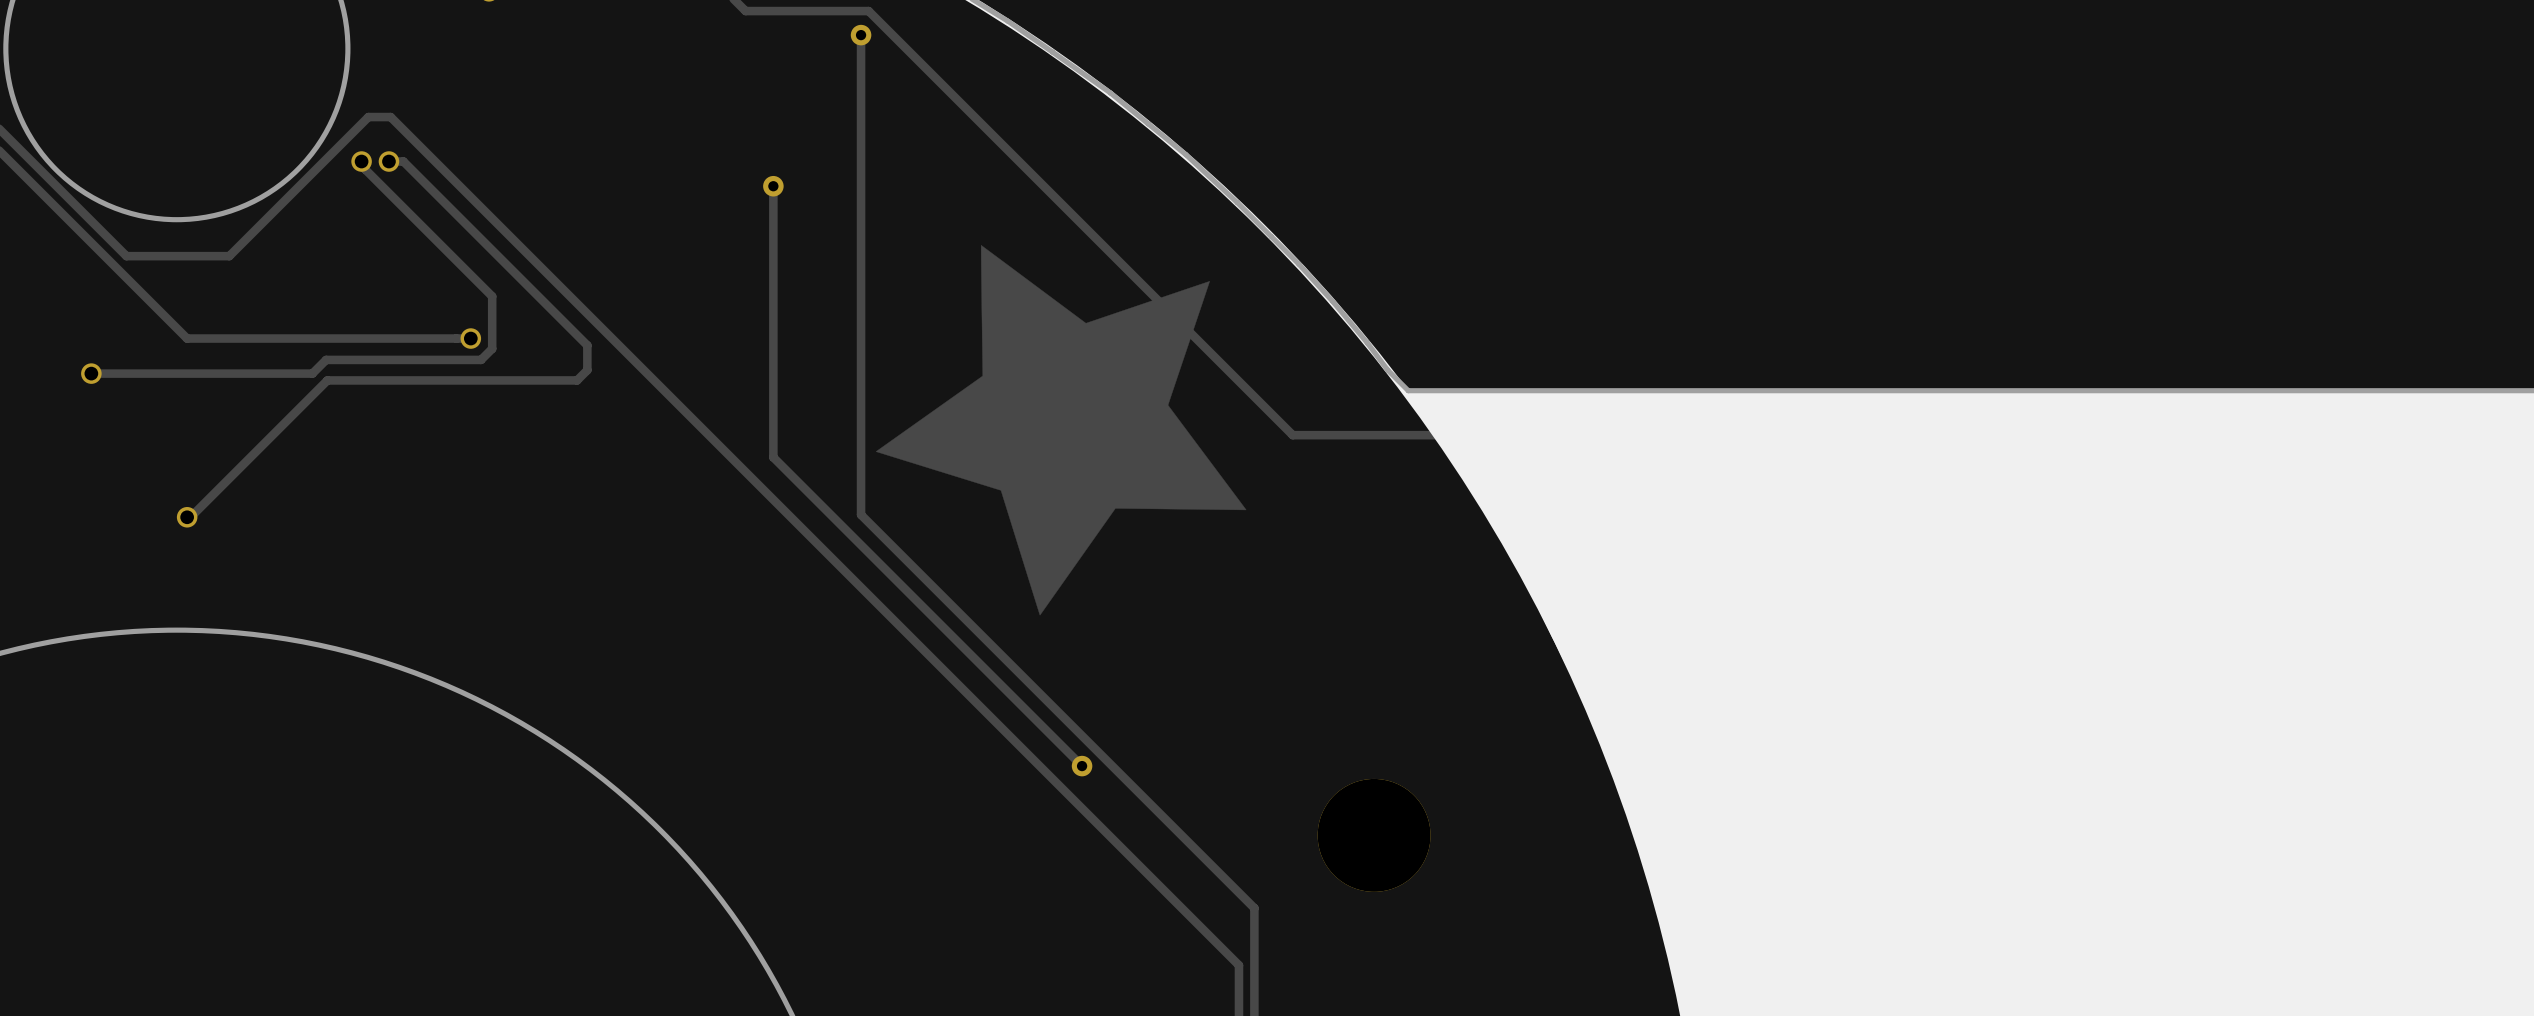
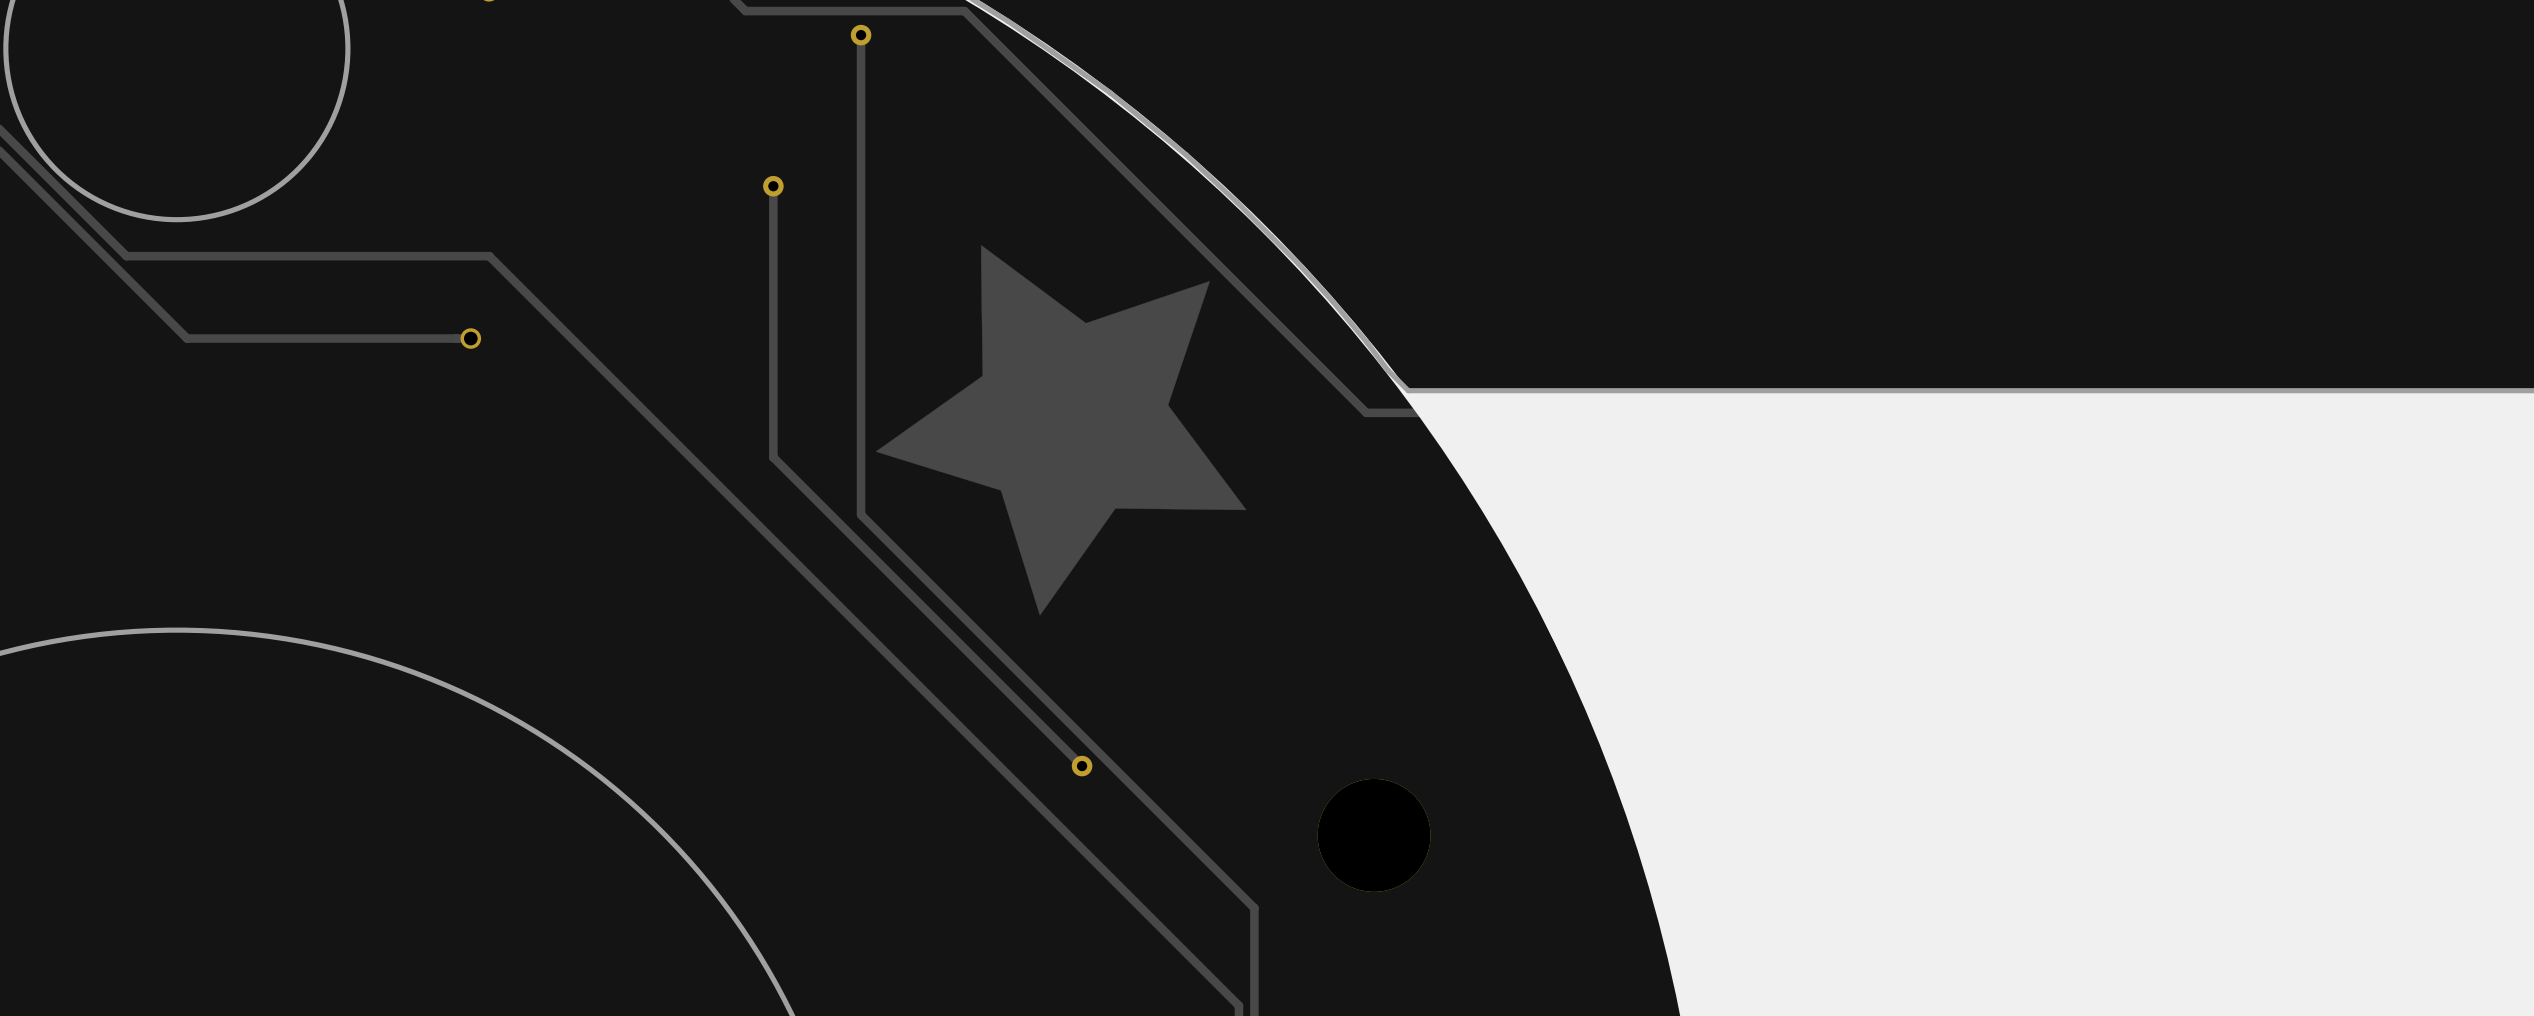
track: (868, 11) (1292, 435) (2290, 435) -> (868, 11) (964, 11) (1366, 412) (2268, 412) (2290, 435)
via: (361, 161) -> none
track: (388, 161) (403, 161) (587, 345) (587, 370) (577, 380) (327, 380) (190, 517) (187, 517) -> none
via: (388, 161) -> none
track: (364, 168) (492, 296) (492, 348) (481, 359) (326, 359) (312, 373) (91, 373) -> none
track: (229, 256) (368, 117) (390, 117) (1238, 965) (1238, 1005) -> (229, 256) (489, 256) (1238, 1005)
via: (91, 373) -> none
via: (187, 517) -> none

